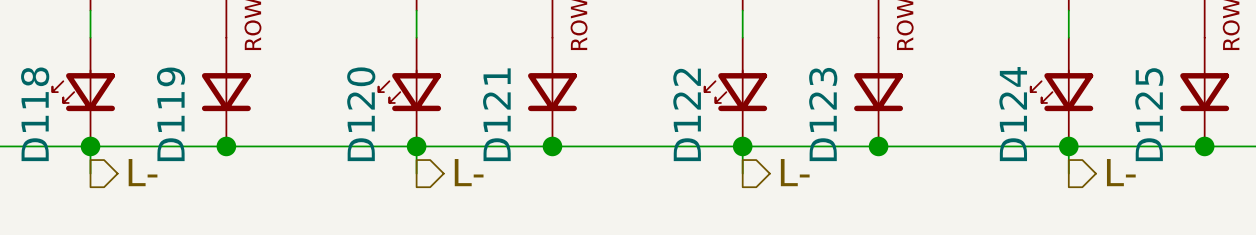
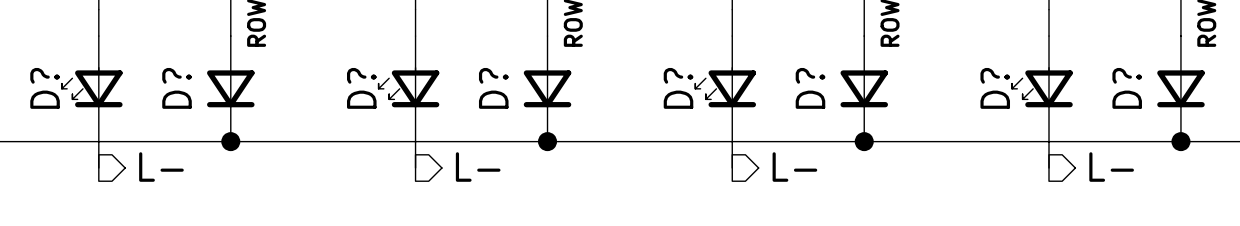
D118 name: D118 (35, 114) -> D? (45, 88)
D119 name: D119 (171, 114) -> D? (177, 88)
D120 name: D120 (361, 114) -> D? (361, 88)
D121 name: D121 (496, 114) -> D? (493, 88)
D122 name: D122 (687, 114) -> D? (678, 88)
D123 name: D123 (823, 114) -> D? (810, 88)
D124 name: D124 (1013, 114) -> D? (995, 88)
D125 name: D125 (1149, 114) -> D? (1127, 88)
junction: (90, 146) -> none
junction: (416, 146) -> none
junction: (742, 146) -> none
junction: (1068, 146) -> none

